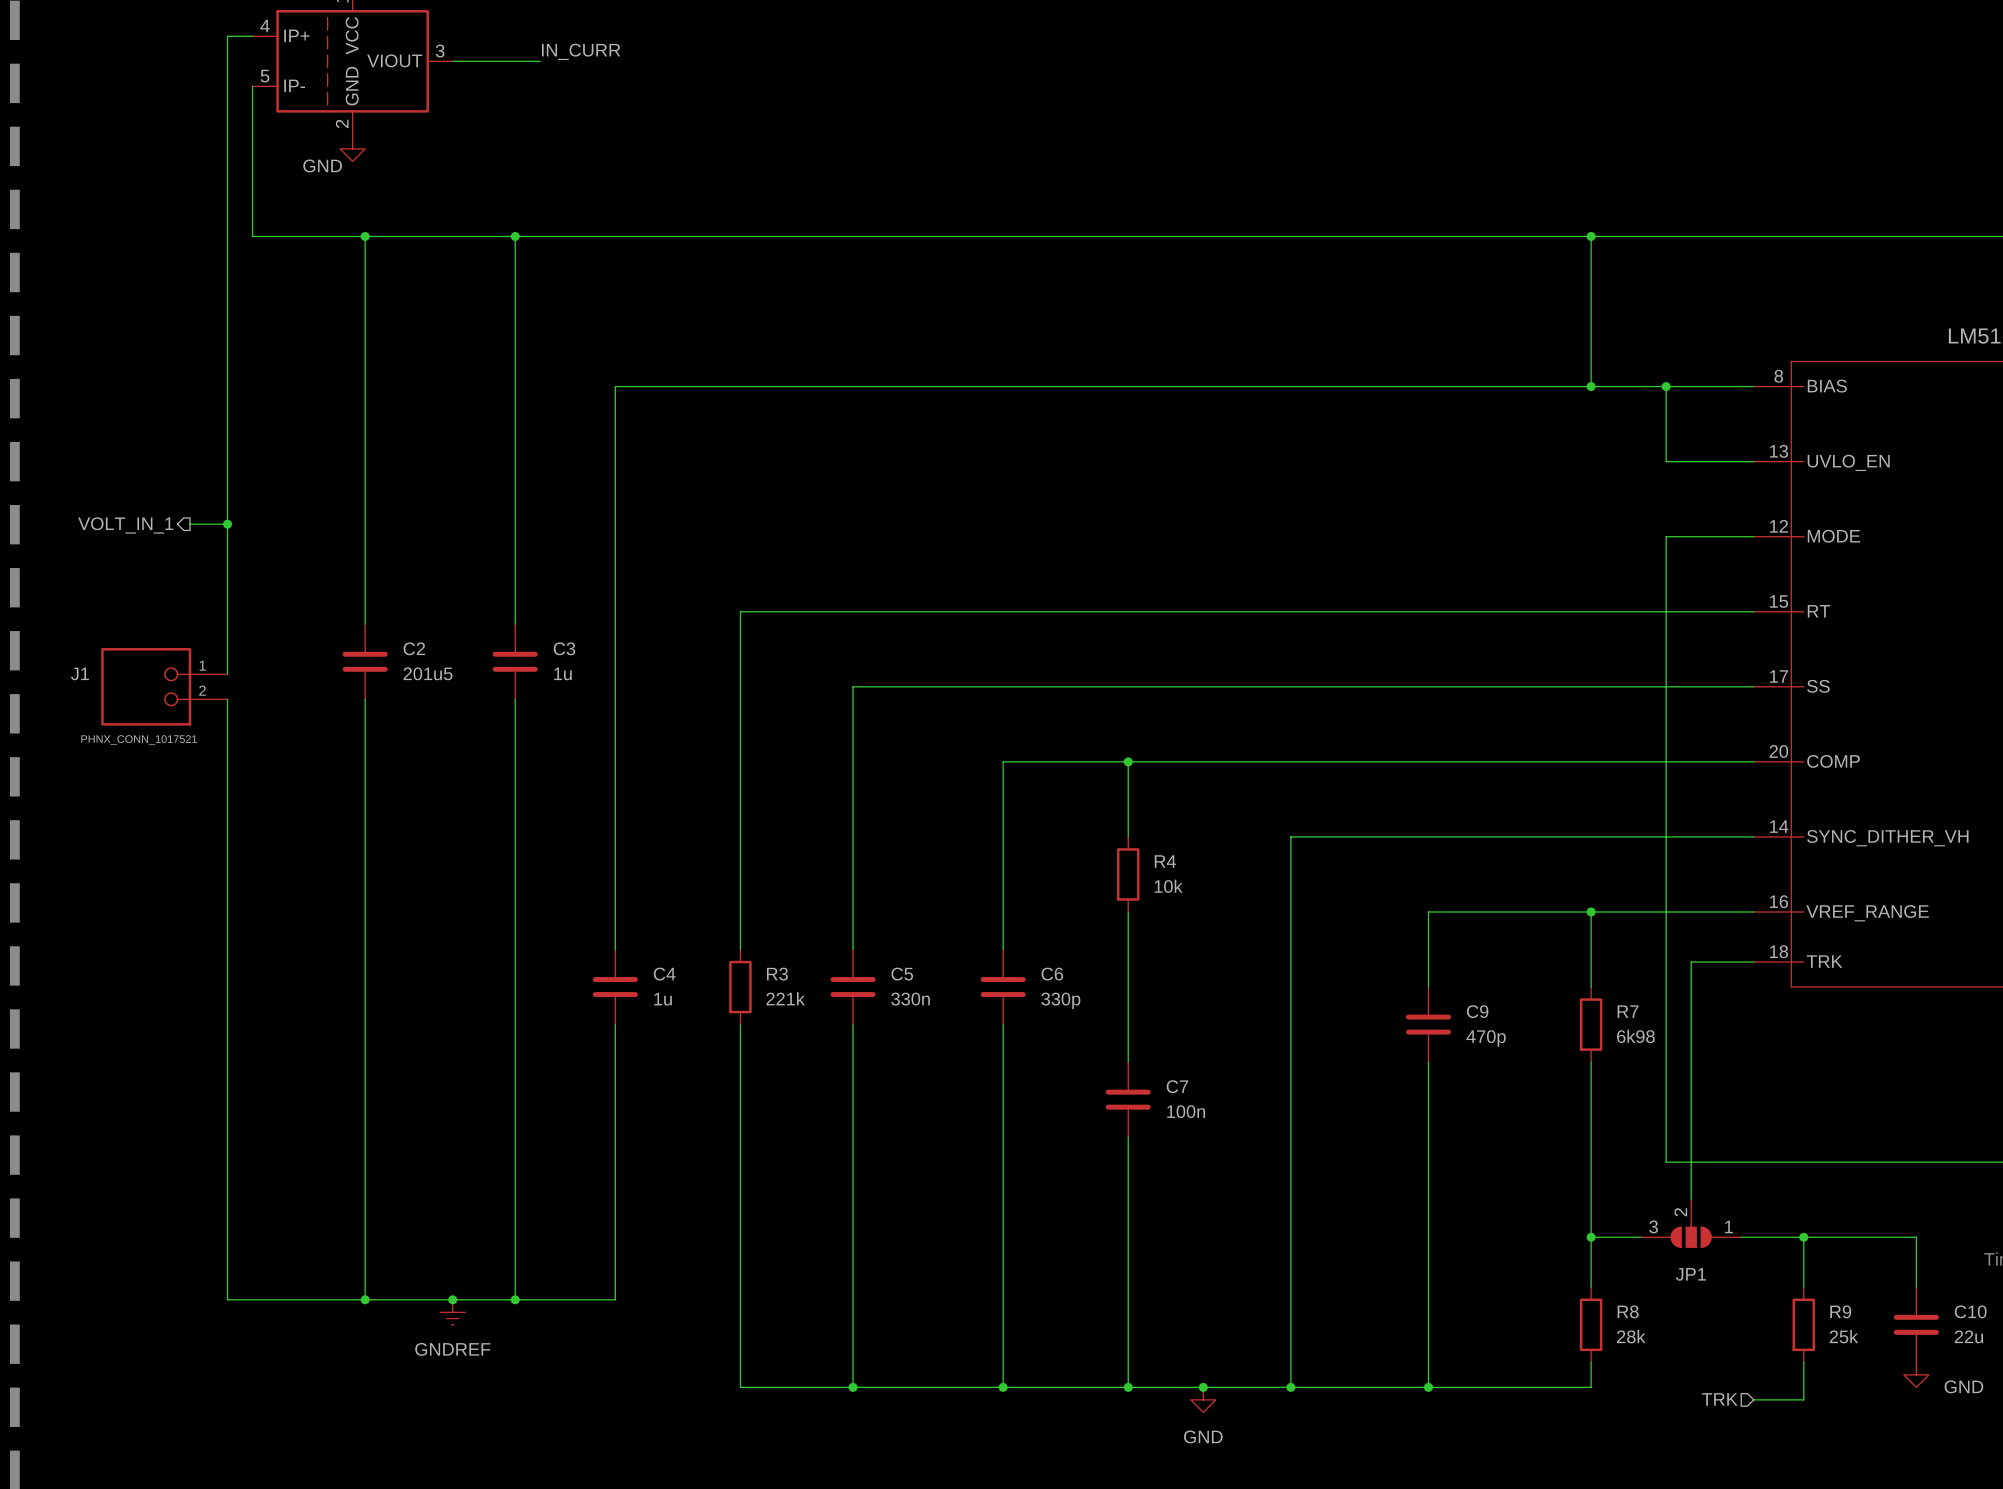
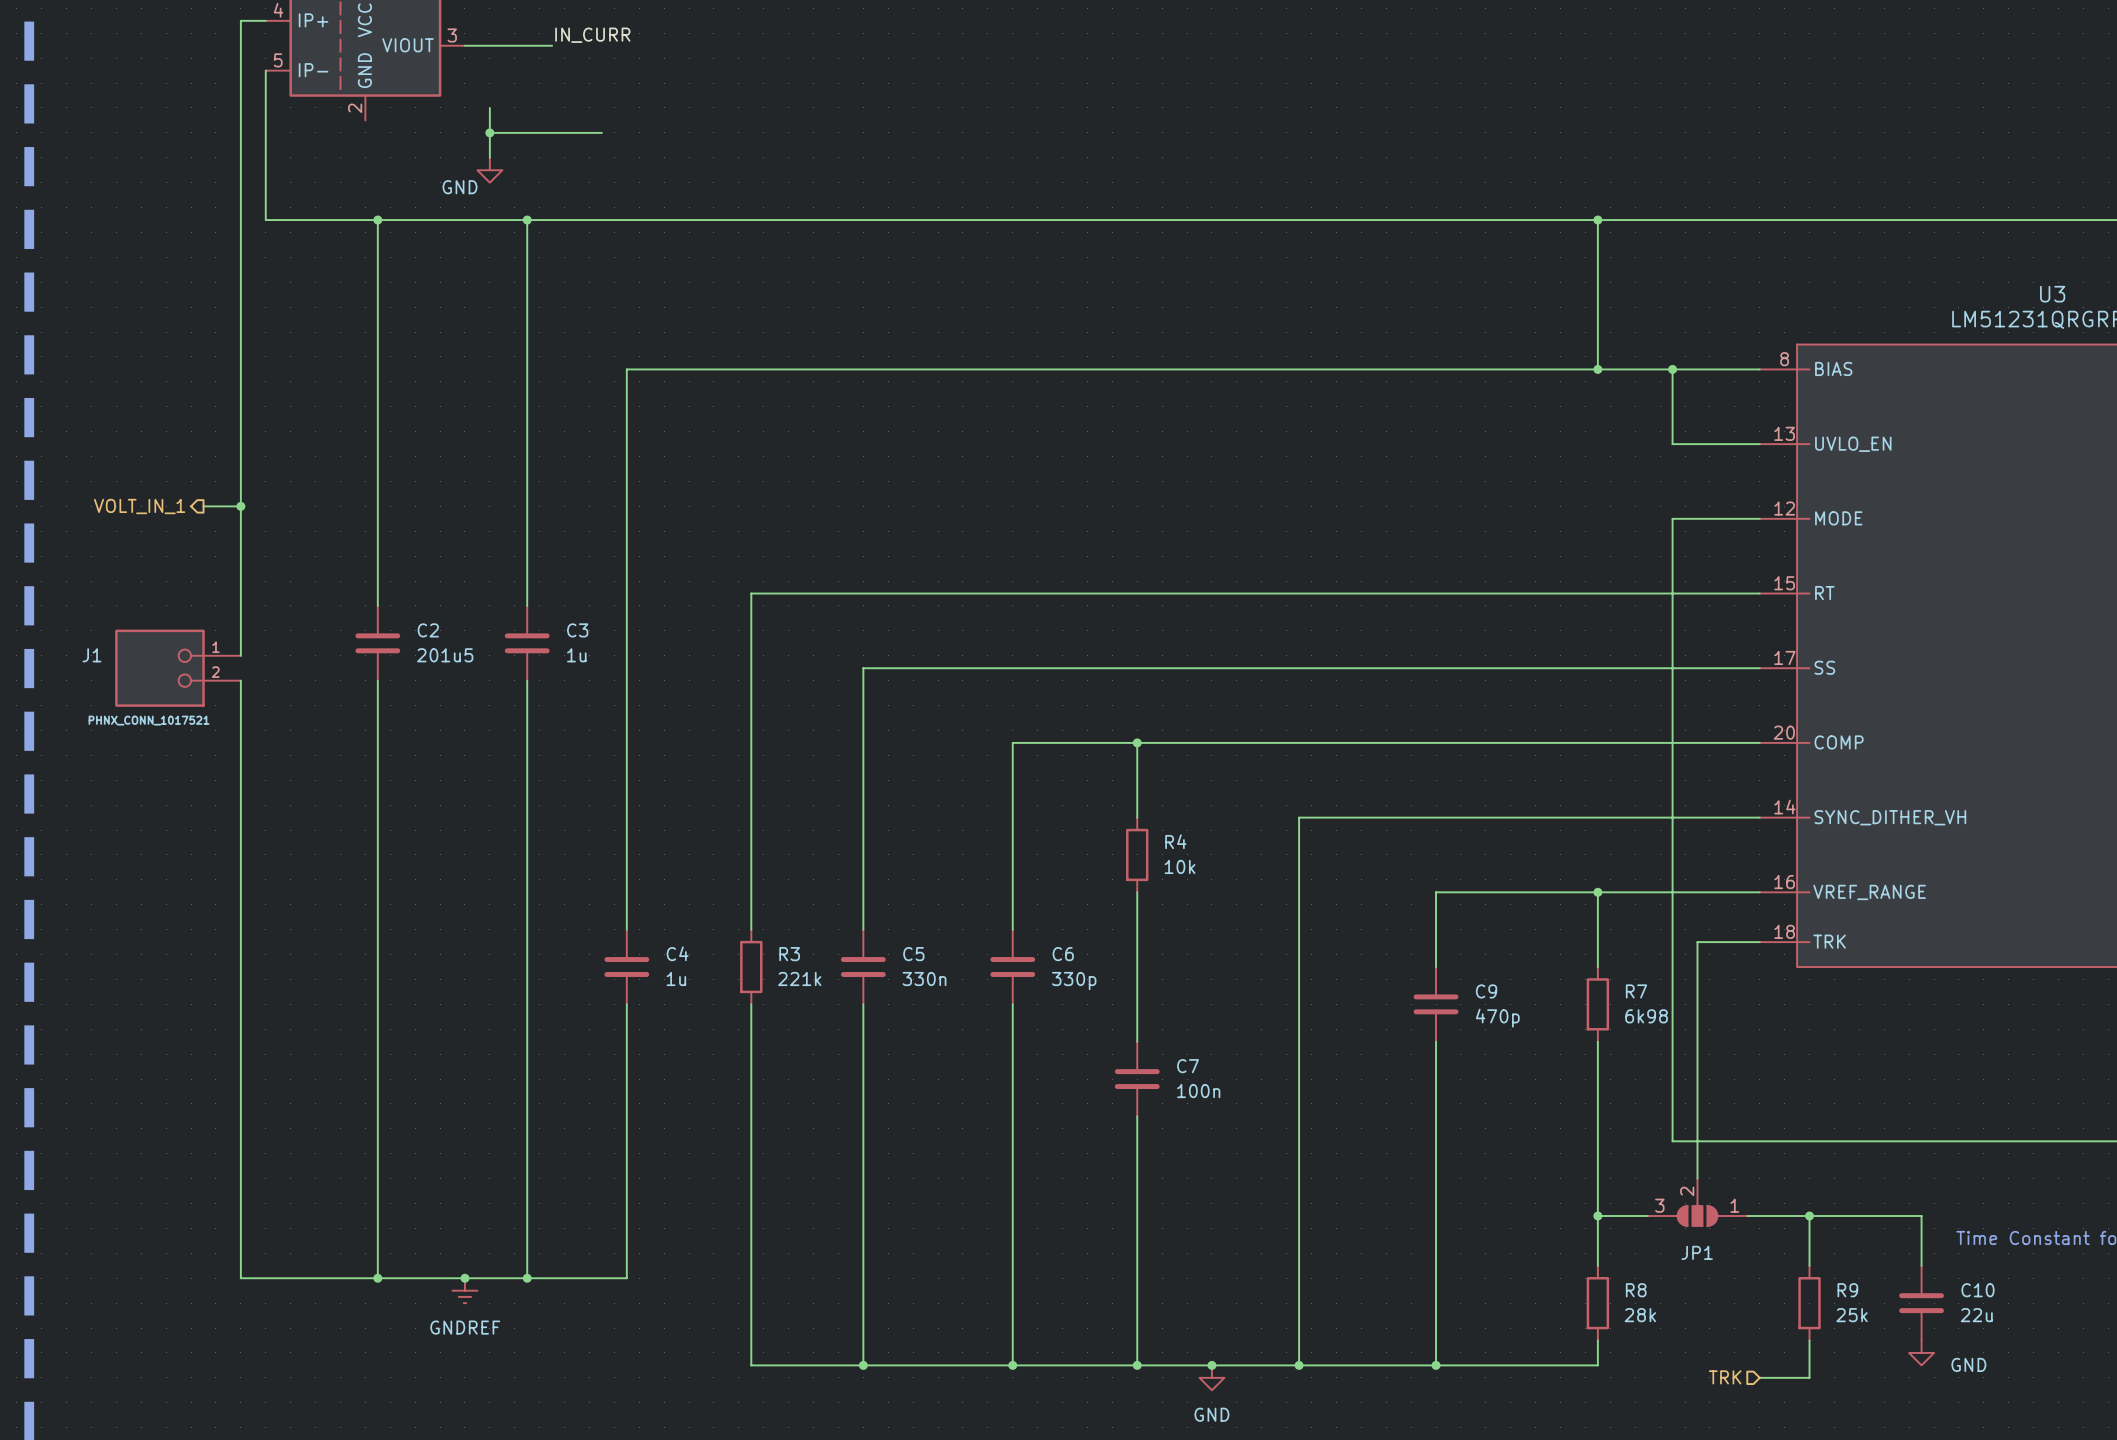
wire: none -> (489, 107) (489, 157)
power symbol: GND (352, 148) -> none
wire: none -> (489, 132) (601, 132)
junction: none -> (489, 132)
power symbol: none -> GND (489, 170)

